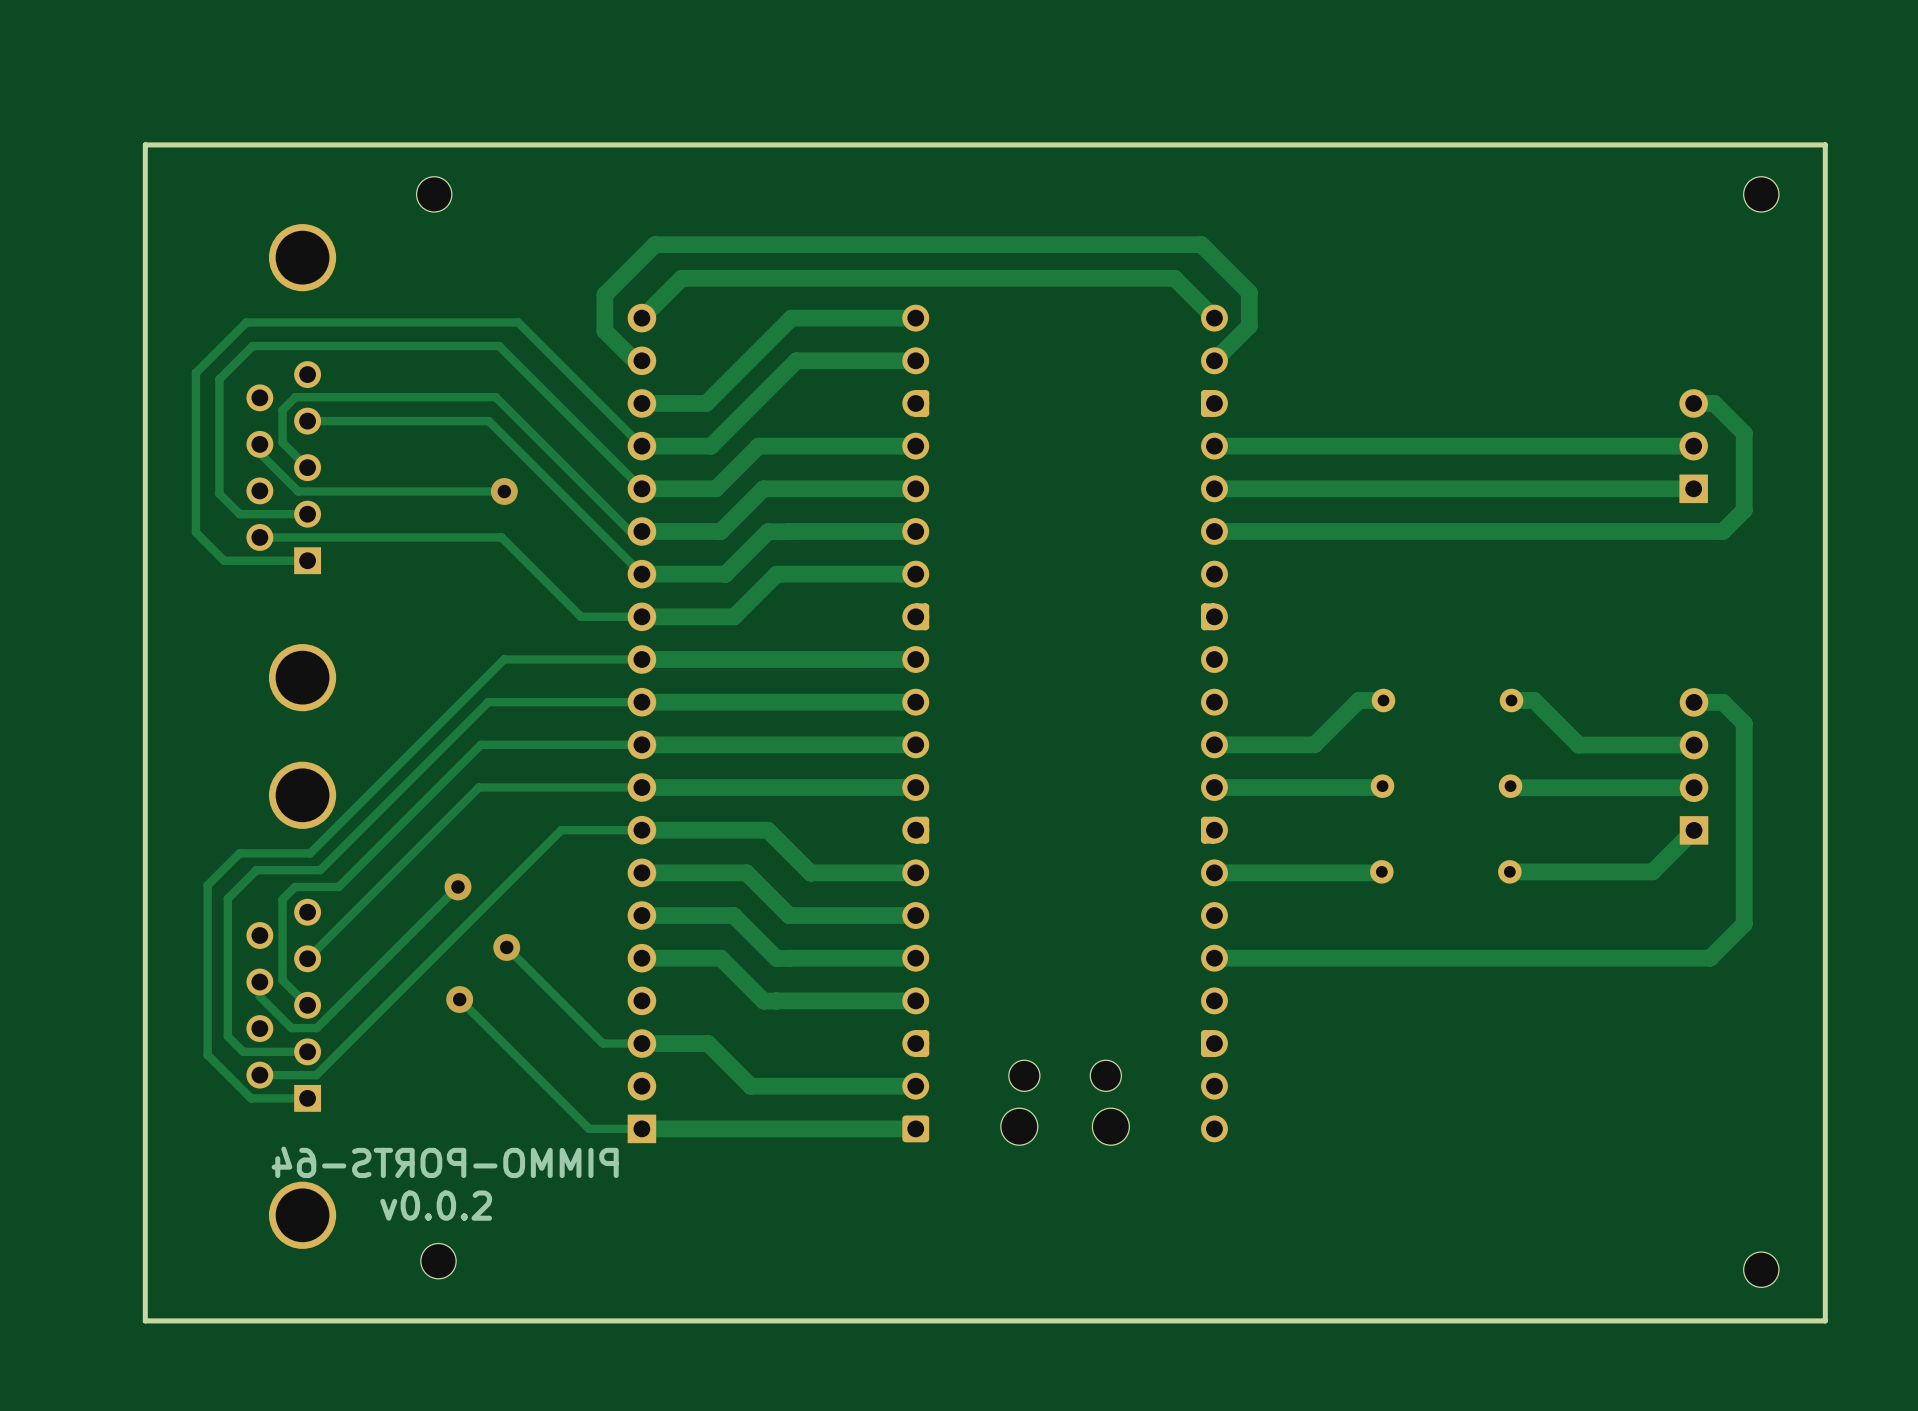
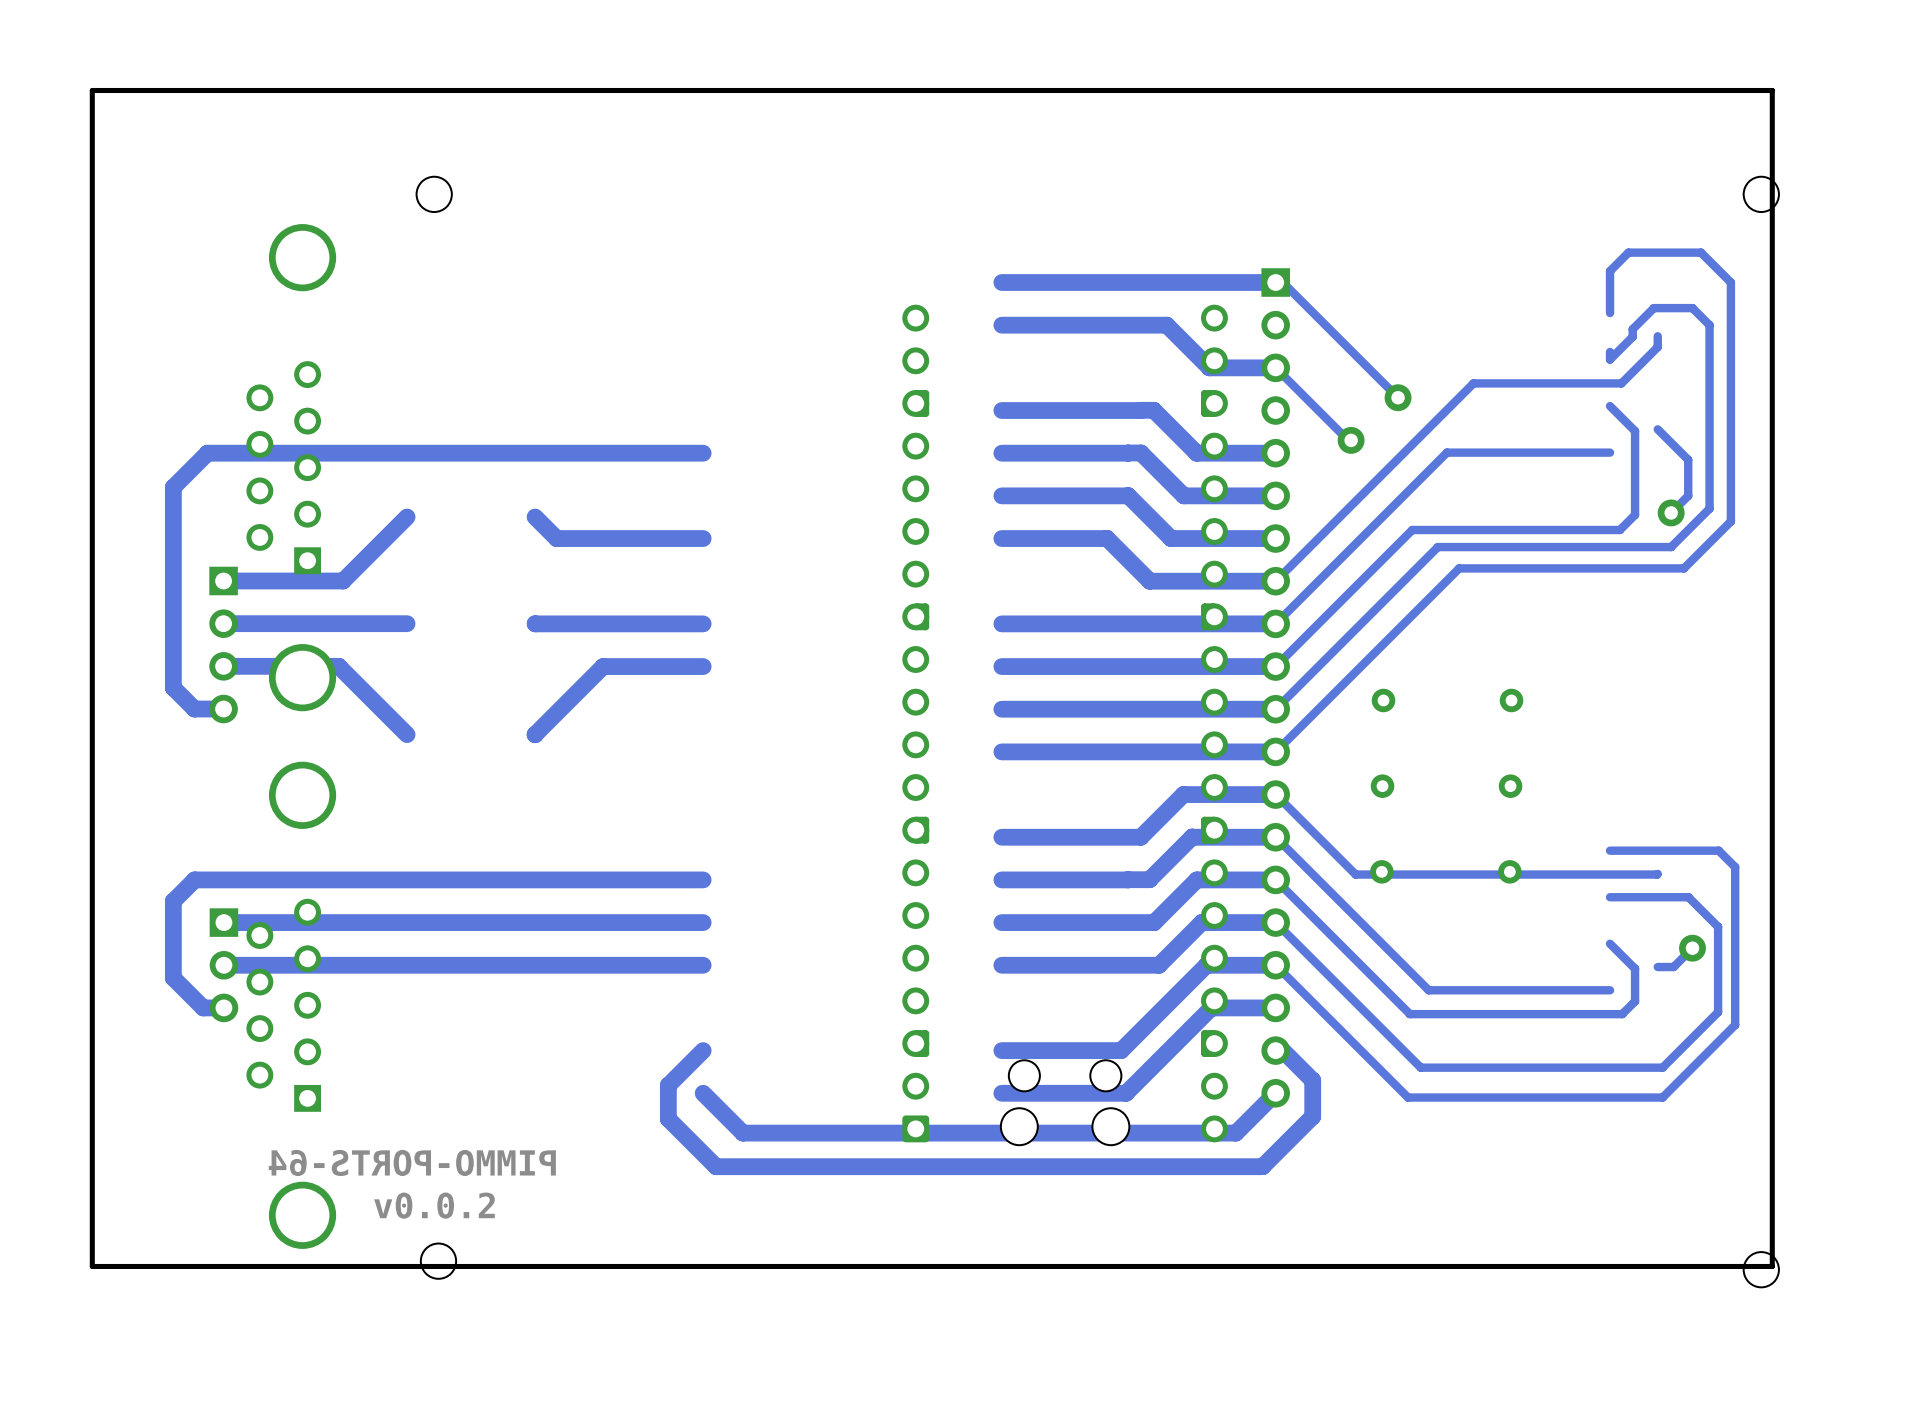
board edge: (1825, 144) (145, 144) (145, 1320) (1825, 1320) (1825, 144) -> (1772, 90) (92, 90) (92, 1266) (1772, 1266) (1772, 90)
track: none -> (1001, 282) (1282, 282) (1398, 397)
track: none -> (1610, 313) (1610, 271) (1628, 252) (1701, 252) (1730, 282) (1730, 521) (1683, 568) (1459, 568) (1275, 751) (1001, 751)
track: (915, 318) (791, 318) (706, 403) (641, 403) -> none
track: (1214, 318) (1174, 278) (681, 278) (641, 318) -> none
track: none -> (1001, 325) (1166, 325) (1209, 367) (1275, 367)
track: none -> (1657, 336) (1657, 347) (1621, 383) (1473, 383) (1275, 581) (1149, 581) (1106, 538)
track: none -> (1610, 351) (1610, 359) (1632, 336) (1632, 329) (1653, 308) (1692, 308) (1709, 325) (1709, 508) (1671, 547) (1437, 547) (1275, 709) (1001, 709)
track: (915, 360) (796, 360) (711, 446) (641, 446) (518, 322) (246, 322) (195, 372) (195, 532) (224, 560) (307, 560) -> none
track: (1214, 360) (1249, 326) (1249, 292) (1201, 244) (655, 244) (604, 294) (604, 330) (634, 360) -> none
track: none -> (1275, 367) (1348, 440) (1351, 440)
via: none -> (1398, 397)
track: (1693, 403) (1714, 403) (1744, 433) (1744, 510) (1722, 531) (1214, 531) -> none
track: none -> (1610, 406) (1635, 431) (1635, 514) (1619, 530) (1412, 530) (1275, 666) (1001, 666)
track: none -> (1140, 410) (1001, 410)
track: none -> (1141, 410) (1153, 410) (1196, 453) (1275, 453)
track: (307, 421) (488, 421) (641, 574) (725, 574) -> none
track: none -> (1657, 429) (1688, 459) (1688, 495) (1671, 512)
via: none -> (1351, 440)
track: (259, 444) (259, 453) (298, 491) (504, 491) -> none
track: (915, 446) (758, 446) (715, 488) (641, 488) (499, 346) (252, 346) (219, 379) (219, 493) (239, 514) (307, 514) -> none
track: (1693, 446) (1214, 446) -> none
part: (1693, 446) -> none
track: none -> (1128, 452) (1141, 452) (1183, 495) (1275, 495)
track: none -> (1610, 452) (1446, 452) (1275, 623) (1001, 623)
track: none -> (703, 453) (207, 453) (173, 487) (173, 687) (194, 709) (223, 709)
track: none -> (1128, 453) (1001, 453)
track: (307, 467) (282, 442) (282, 410) (295, 397) (495, 397) (630, 531) (720, 531) (763, 488) (915, 488) -> none
track: (1693, 488) (1214, 488) -> none
via: (504, 491) -> none
track: none -> (1128, 495) (1171, 538) (1275, 538)
via: none -> (1671, 512)
track: none -> (407, 516) (343, 580) (223, 580)
track: none -> (535, 516) (556, 538) (703, 538)
track: (789, 531) (768, 531) (725, 574) -> none
track: (915, 531) (789, 531) -> (1128, 495) (1001, 495)
track: (259, 537) (501, 537) (580, 616) (734, 616) (776, 574) (915, 574) -> none
track: none -> (407, 623) (223, 623)
track: none -> (703, 623) (535, 623)
part: none -> (223, 645)
track: (915, 659) (504, 659) (310, 853) (239, 853) (207, 885) (207, 1055) (251, 1098) (307, 1098) -> none
track: none -> (223, 666) (338, 666) (407, 734)
track: none -> (703, 666) (603, 666) (535, 734)
part: none -> (1275, 687)
track: (1383, 700) (1358, 700) (1314, 744) (1214, 744) -> none
track: (1511, 700) (1534, 700) (1578, 745) (1694, 745) -> none
track: (641, 702) (488, 702) (320, 870) (256, 870) (227, 898) (227, 1036) (243, 1051) (307, 1051) (307, 1059) -> none
track: (915, 702) (641, 702) -> none
track: (1694, 702) (1723, 702) (1744, 723) (1744, 924) (1710, 958) (1214, 958) -> none
part: (641, 723) -> none
track: (915, 744) (480, 744) (338, 886) (295, 886) (282, 899) (282, 980) (307, 1005) -> none
part: (1694, 766) -> none
track: (915, 787) (478, 787) (307, 958) -> none
track: (1382, 787) (1214, 787) -> none
track: (1694, 787) (1510, 787) -> none
track: (1694, 830) (1652, 871) (1509, 871) -> none
track: none -> (1001, 837) (1140, 837) (1183, 794) (1275, 794) (1355, 874) (1657, 873)
track: none -> (1192, 837) (1149, 879) (1128, 879)
track: none -> (1192, 837) (1275, 837) (1428, 990) (1610, 990)
track: none -> (1610, 850) (1718, 850) (1735, 867) (1735, 1025) (1662, 1097) (1407, 1097) (1275, 965) (1206, 965) (1121, 1050) (1001, 1050)
track: (1381, 871) (1214, 872) -> none
track: (641, 872) (746, 872) (789, 915) -> none
track: (915, 872) (810, 872) -> (1106, 538) (1001, 538)
track: (810, 873) (767, 830) (561, 830) (316, 1075) (259, 1075) -> none
track: none -> (703, 879) (194, 879) (173, 901) (173, 978) (203, 1007) (223, 1007)
track: (458, 886) (316, 1028) (291, 1028) (259, 996) (259, 982) -> none
via: (458, 886) -> none
track: none -> (1610, 897) (1688, 897) (1718, 926) (1718, 1012) (1662, 1067) (1420, 1067) (1275, 922) (1201, 922) (1159, 965) (1001, 965)
track: (641, 915) (733, 915) (776, 958) (789, 958) -> none
track: (915, 915) (789, 915) -> (1128, 879) (1001, 879)
track: none -> (703, 922) (223, 922)
track: none -> (1001, 922) (1154, 922) (1196, 879) (1275, 879) (1409, 1014) (1622, 1014) (1635, 1001) (1635, 968) (1610, 943)
via: (506, 947) -> none
track: (508, 947) (506, 947) (602, 1043) (708, 1043) (750, 1086) (915, 1086) -> none
track: none -> (1692, 948) (1673, 967) (1657, 967)
via: none -> (1692, 948)
track: (641, 958) (720, 958) (763, 1001) (776, 1001) -> none
track: (915, 958) (789, 958) -> none
part: none -> (223, 965)
track: none -> (703, 965) (223, 965)
track: (459, 999) (589, 1128) (915, 1128) -> none
via: (459, 999) -> none
track: (915, 1000) (776, 1000) -> none
track: none -> (1275, 1007) (1211, 1007) (1126, 1093) (1001, 1093)
track: none -> (1282, 1050) (1312, 1080) (1312, 1116) (1262, 1166) (716, 1166) (668, 1118) (668, 1085) (703, 1050)
track: none -> (1275, 1093) (1235, 1133) (742, 1133) (703, 1093)

